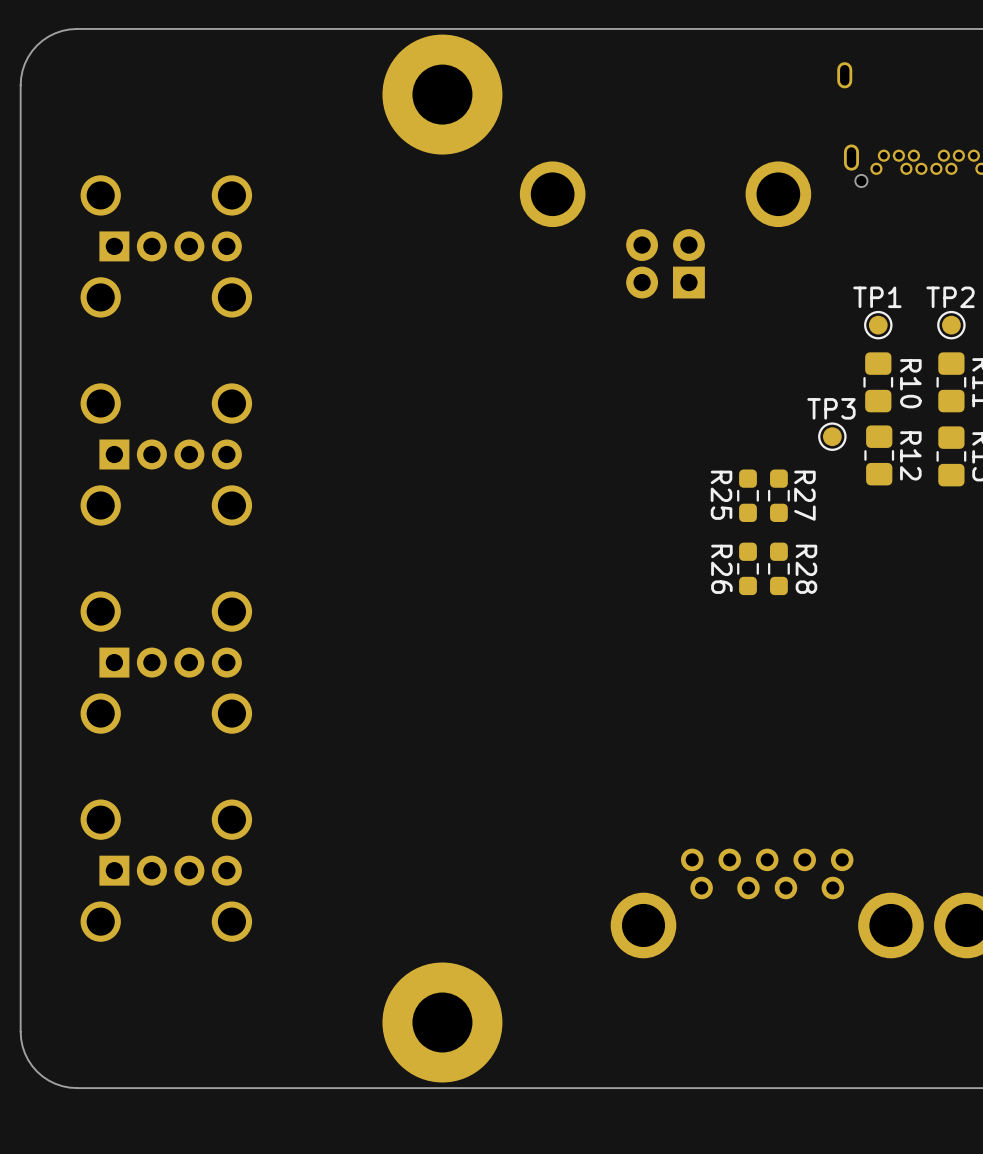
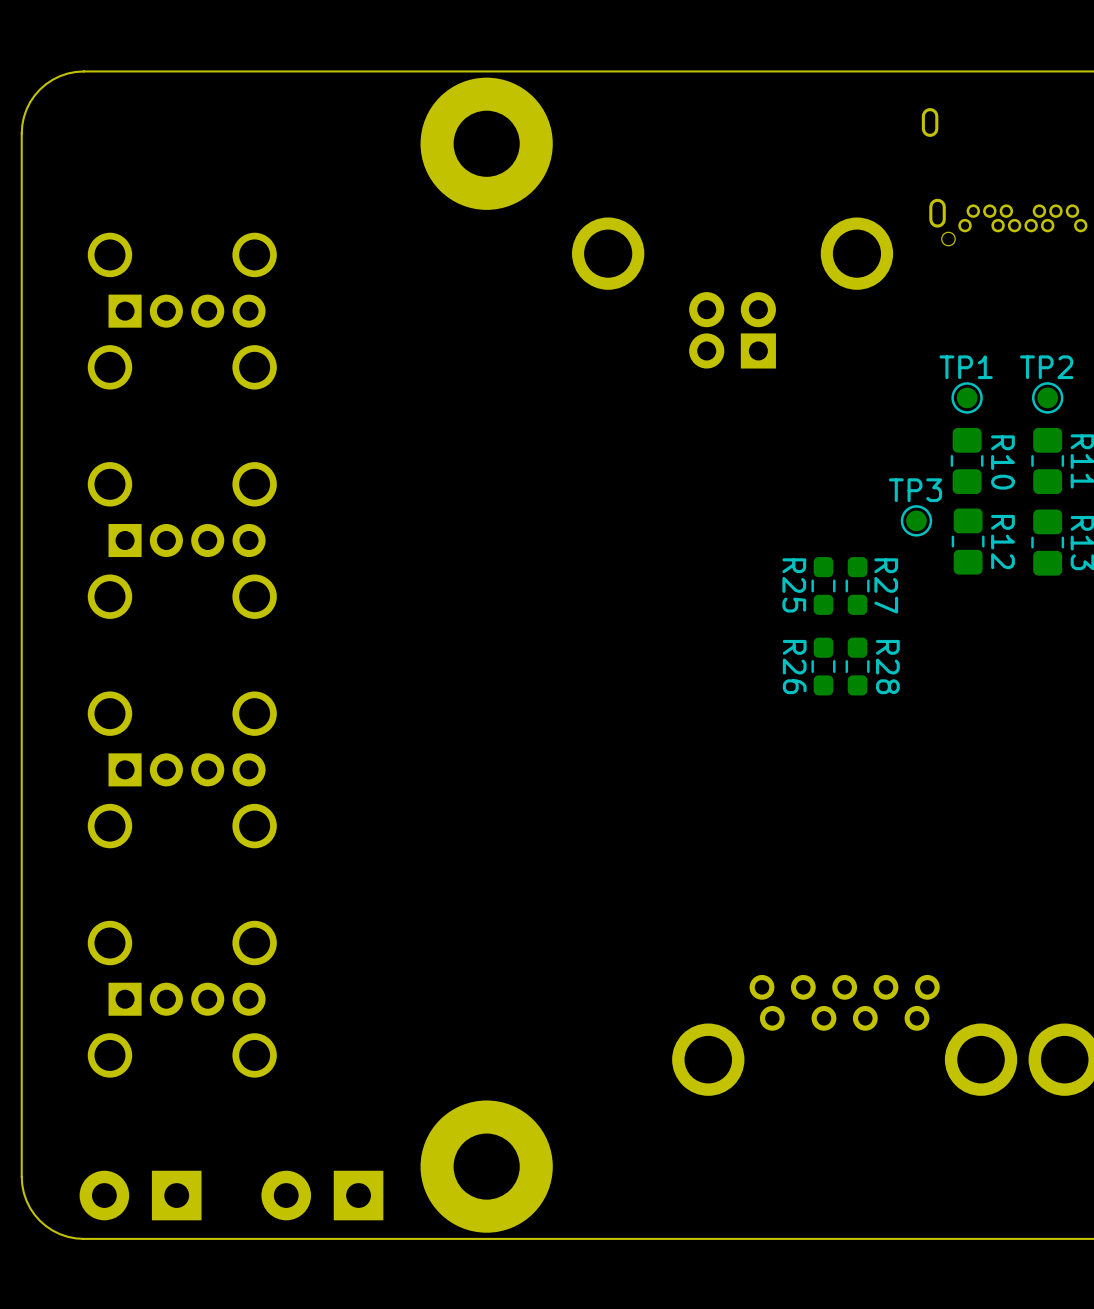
part: none -> (140, 1195)
part: none -> (322, 1195)

